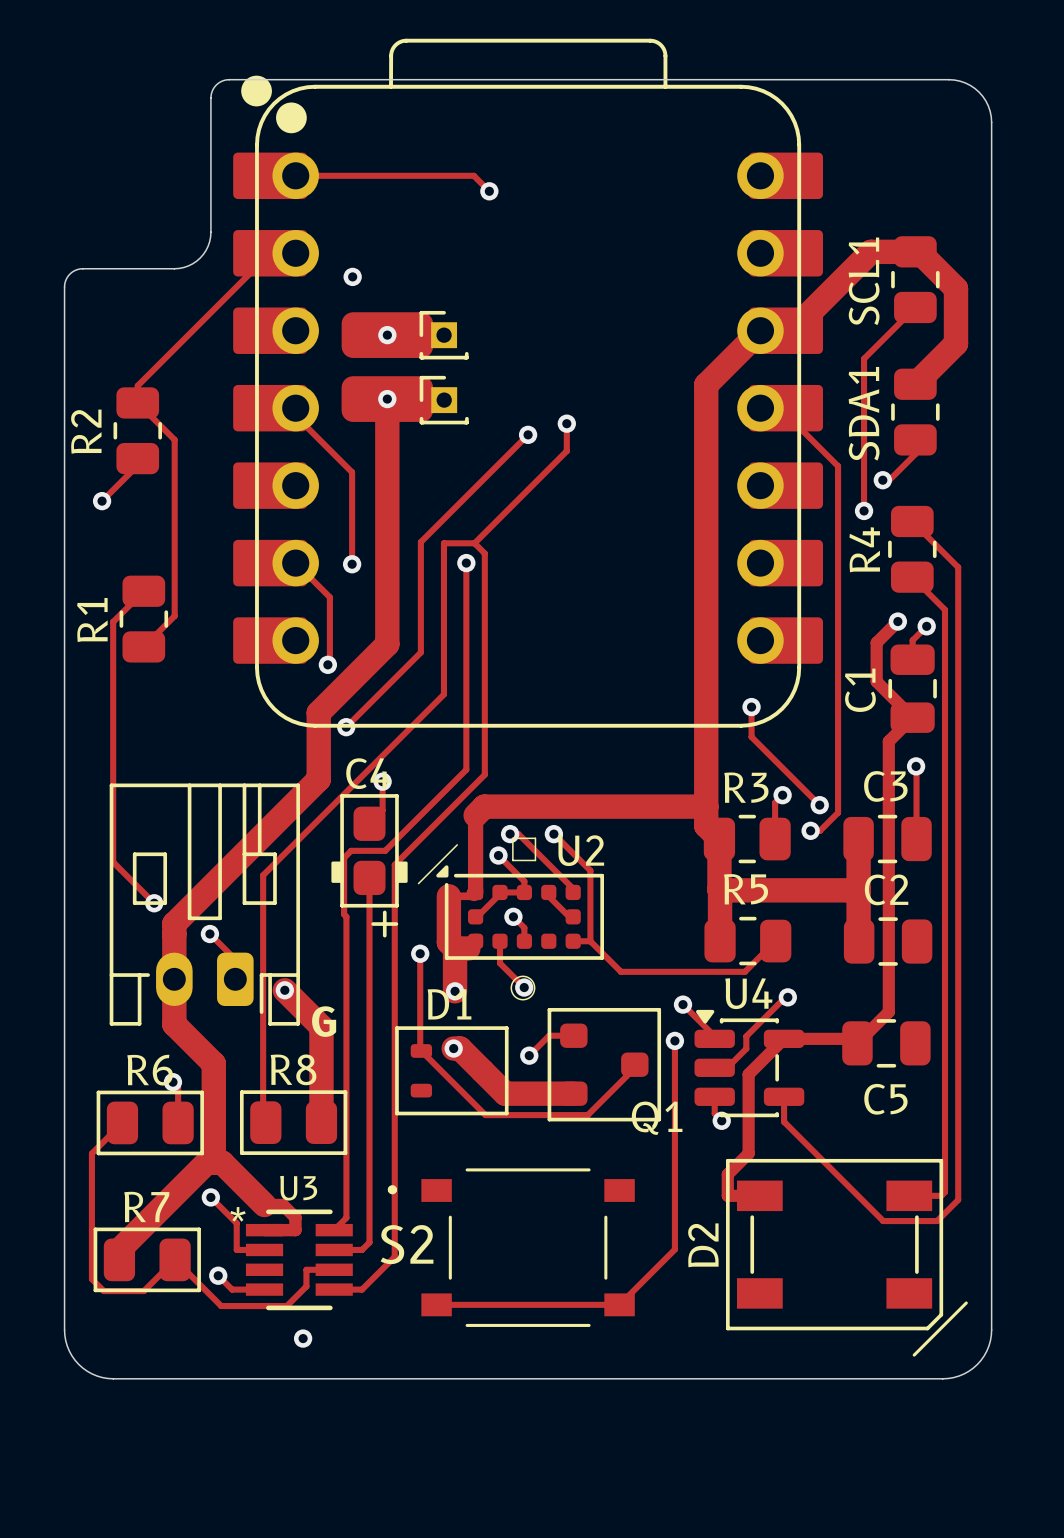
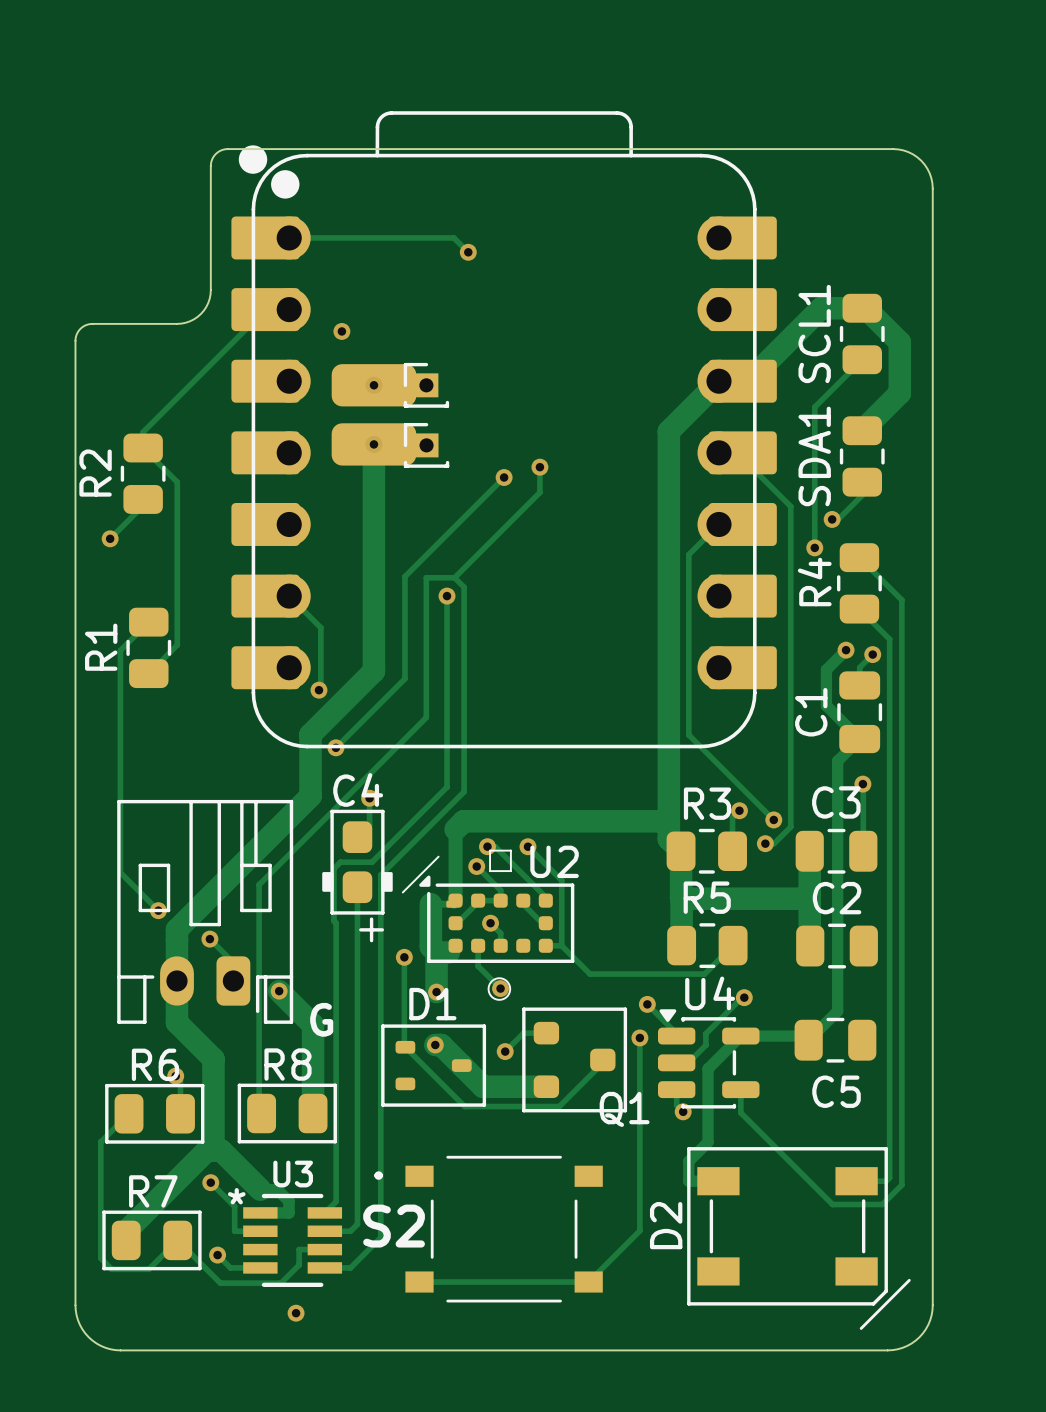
track: (295, 408) (295, 415) (352, 472) (352, 564) -> none
via: (352, 564) -> none
track: (751, 707) (751, 737) -> (719, 524) (688, 554) (688, 734) (710, 756)
via: (751, 707) -> none

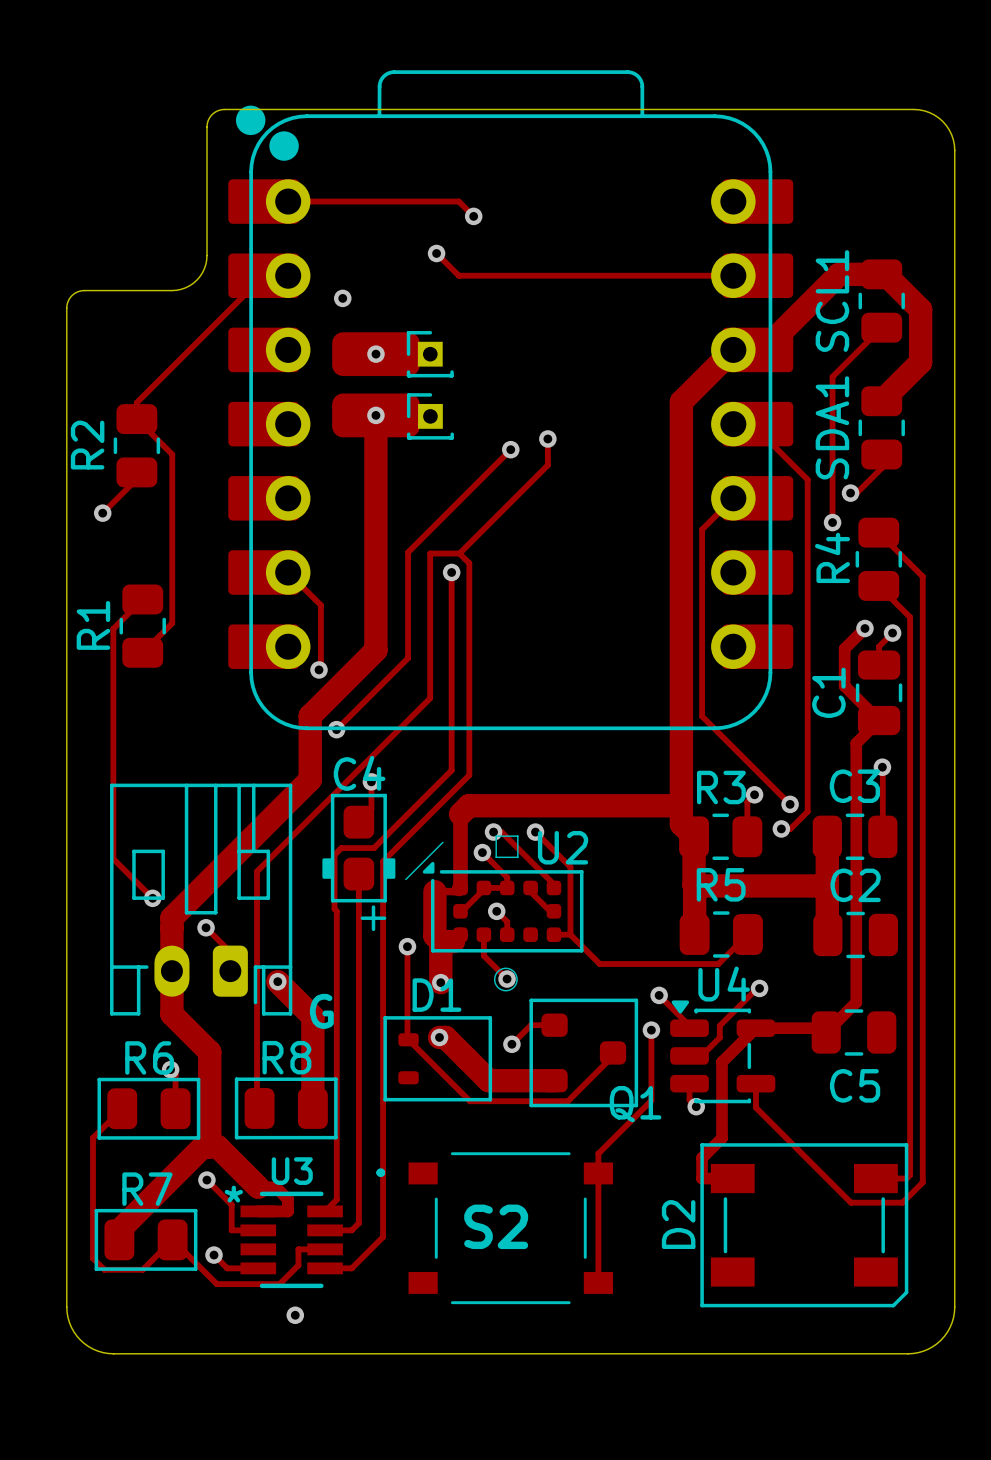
track: none -> (436, 253) (458, 275) (733, 275)
via: none -> (436, 253)
track: (639, 1106) (639, 1230) (588, 1282) (419, 1282) -> (651, 1100) (598, 1153) (598, 1282)
S2 name position: S2 (394, 1226) -> S2 (496, 1226)
line: (909, 1280) (861, 1328) -> none

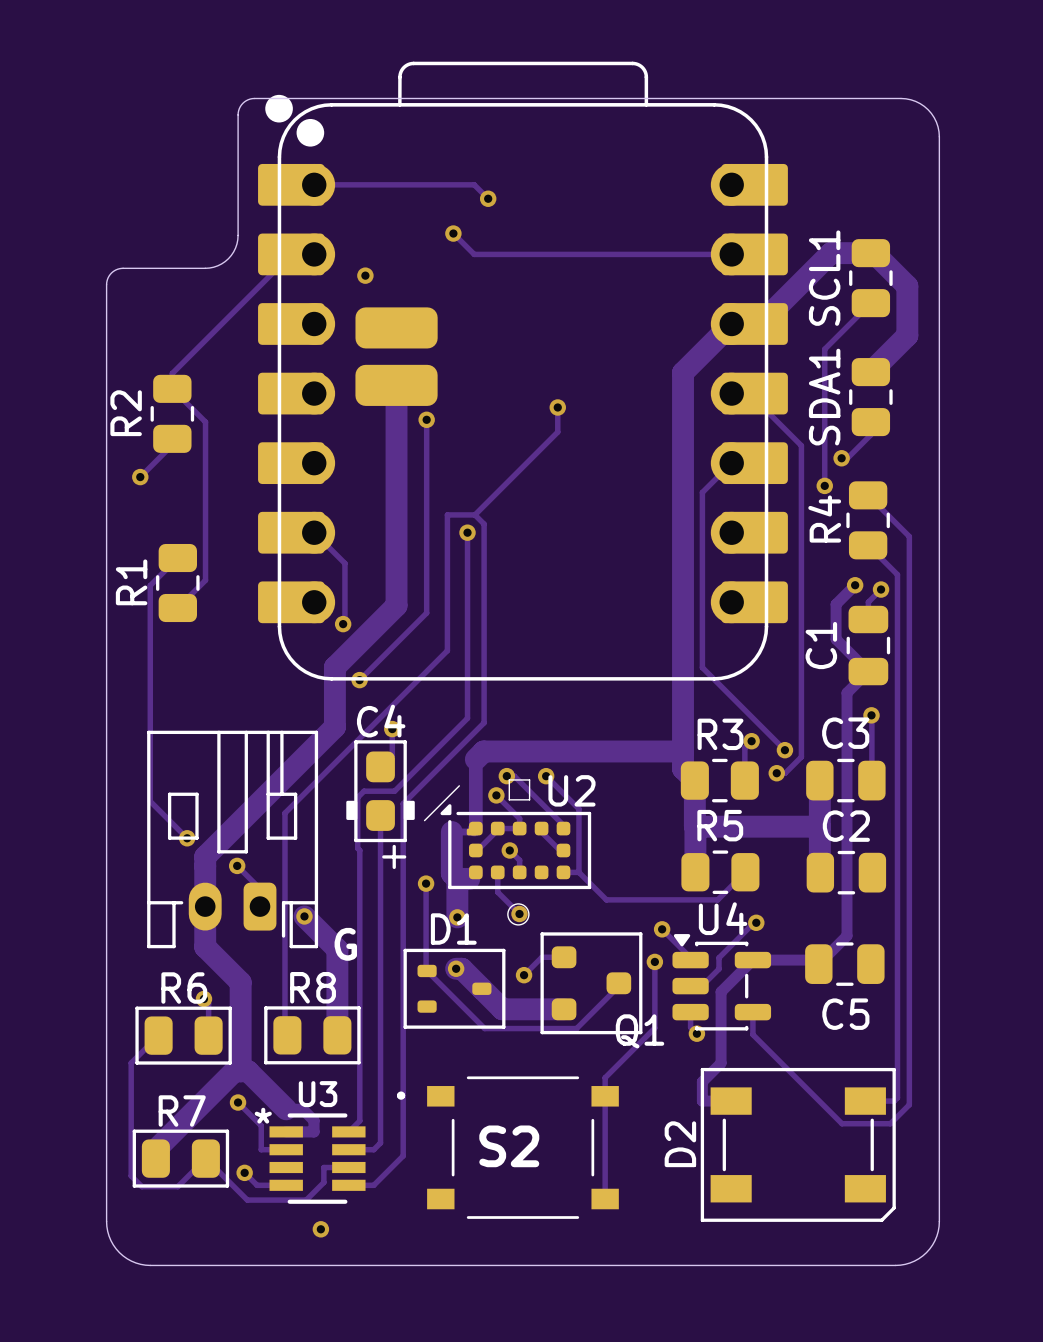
via: (375, 354) -> none
part: (430, 354) -> none
via position: (375, 415) -> (426, 419)
part: (430, 416) -> none
track: (510, 449) (408, 552) -> (426, 419) (426, 513)
via: (510, 449) -> none

